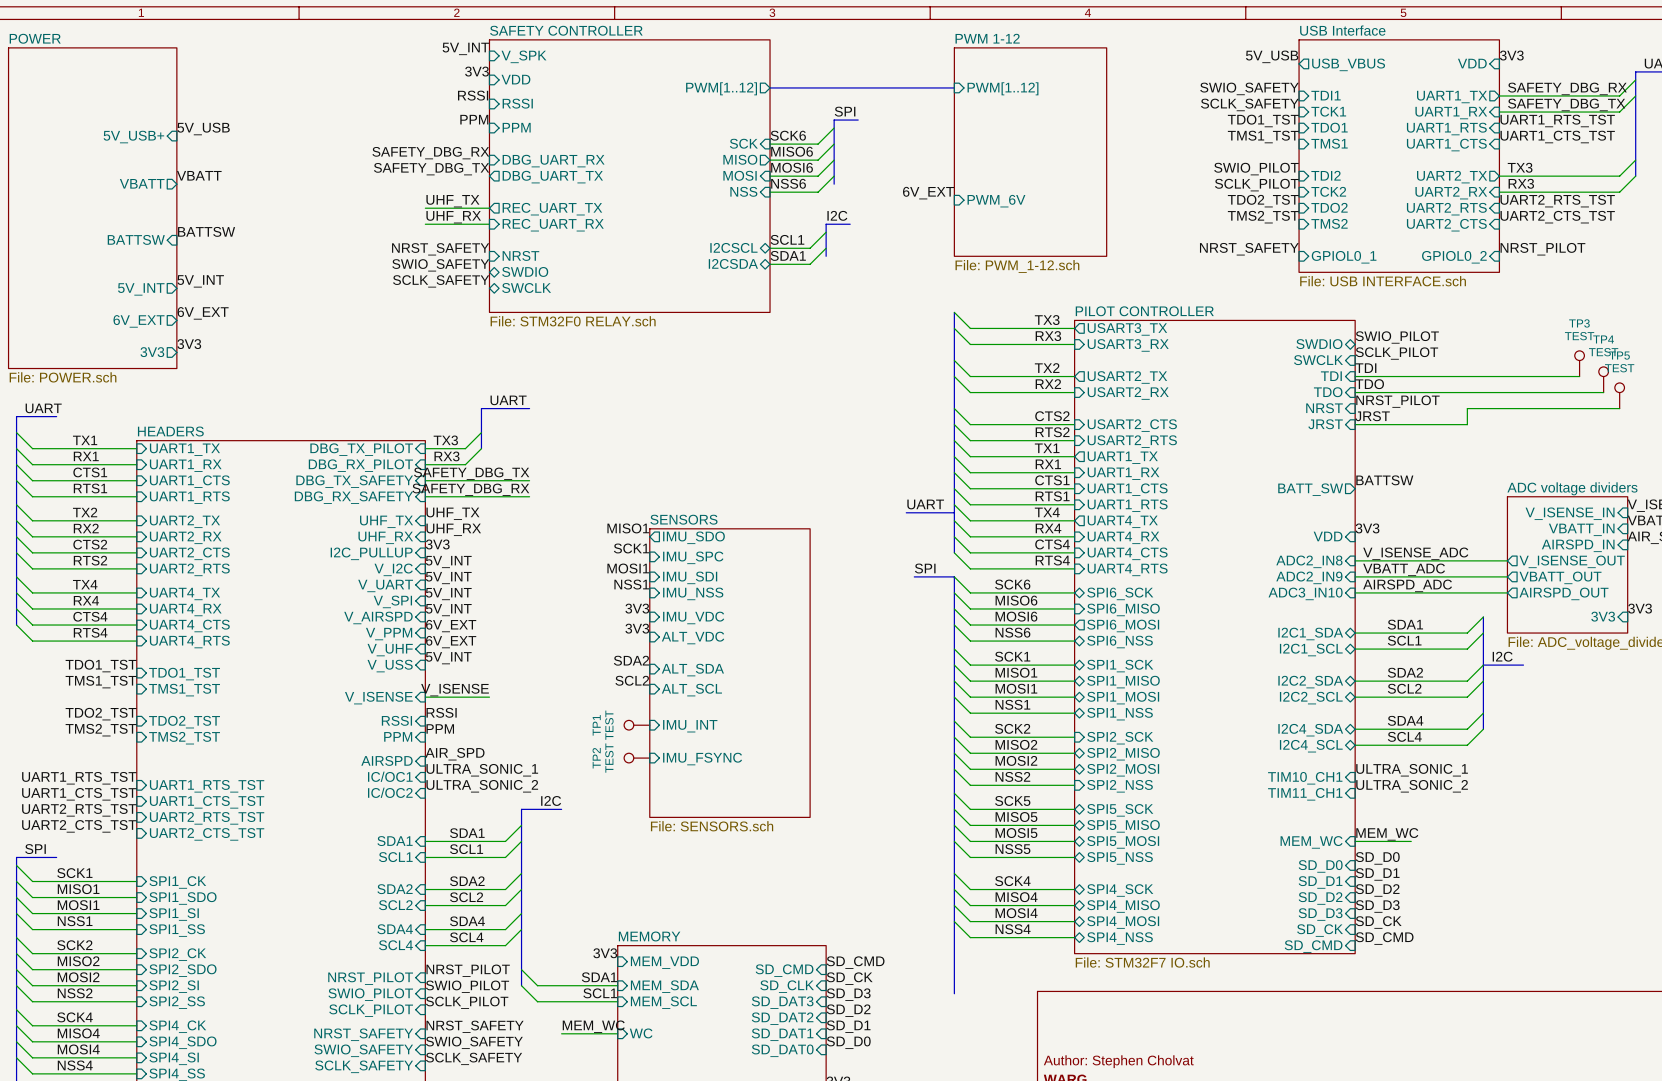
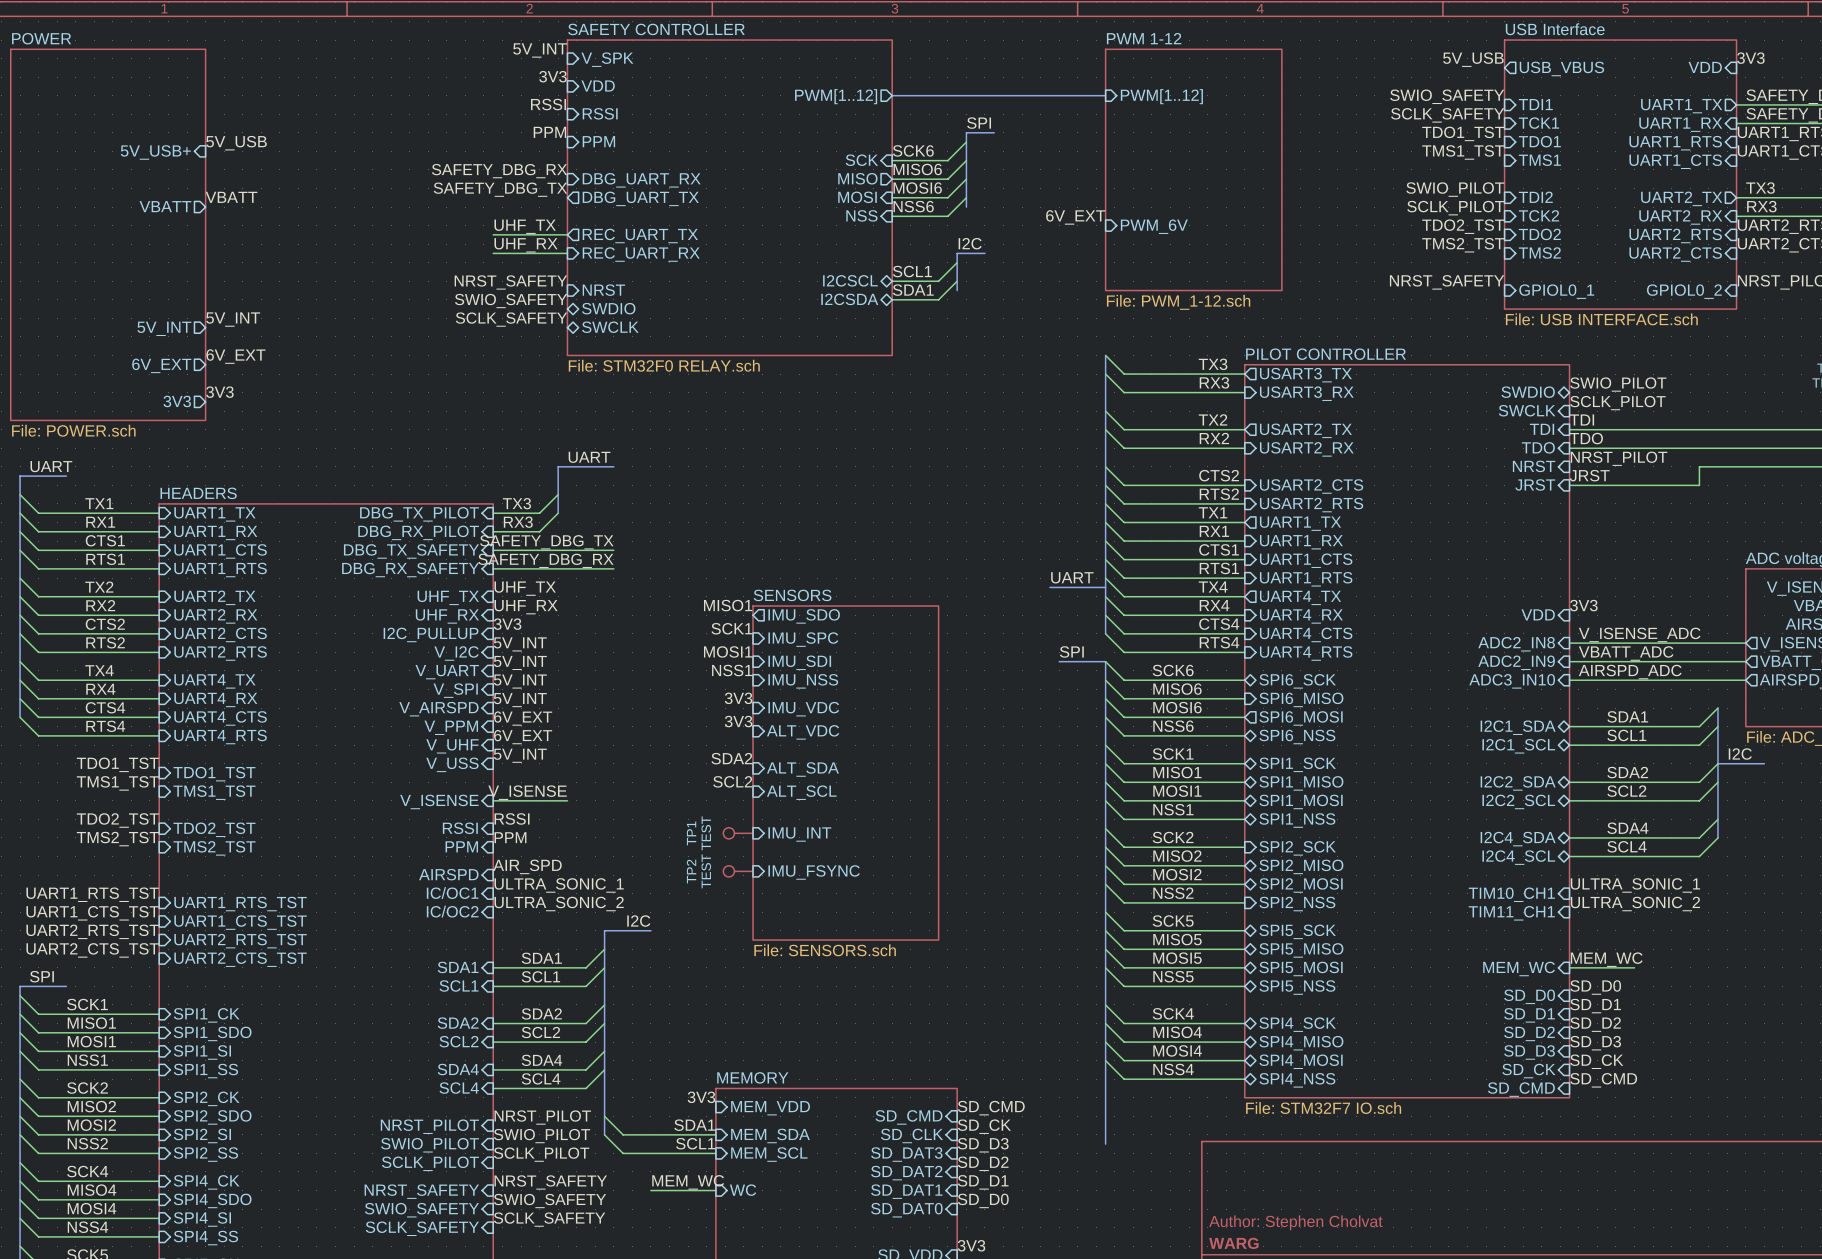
label: BATTSW (206, 231) -> none
sheet pin: BATTSW (136, 239) -> none
label: BATTSW (1384, 480) -> none
sheet pin: BATT_SW (1310, 489) -> none

